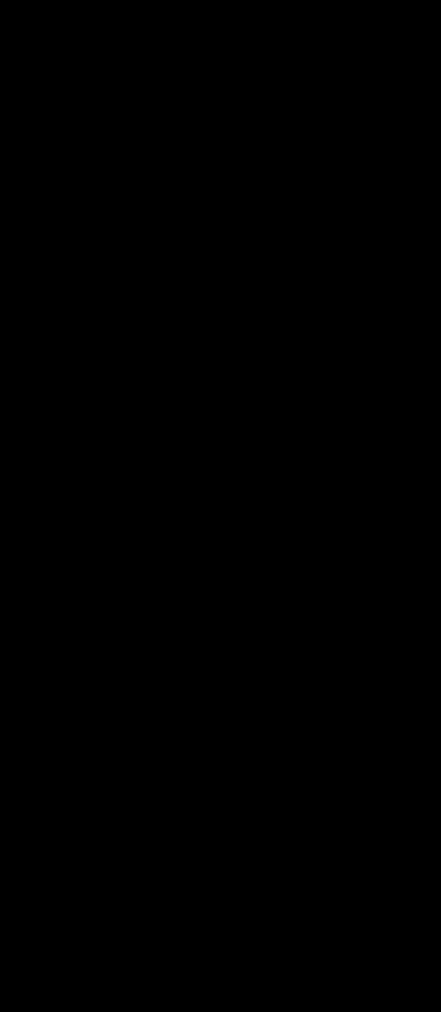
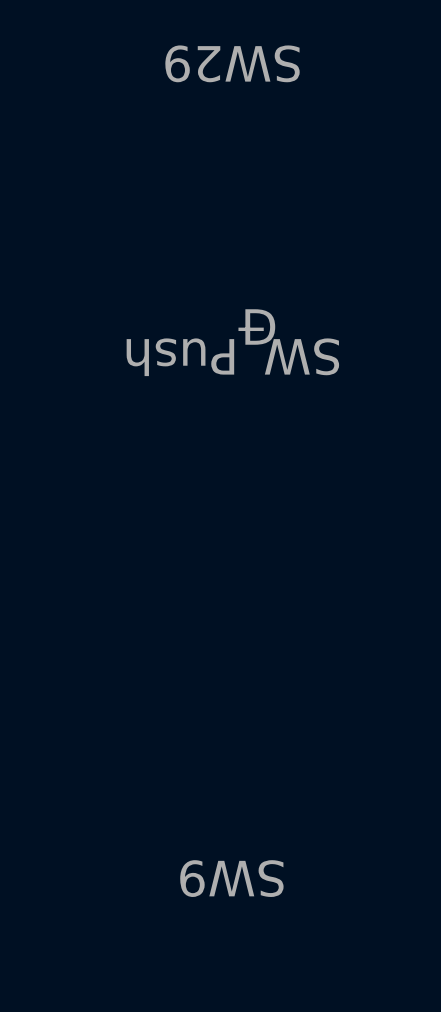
text: none -> SW29 (232, 63)
text: none -> D (260, 326)
text: none -> SW_Push (232, 351)
text: none -> SW9 (231, 878)

